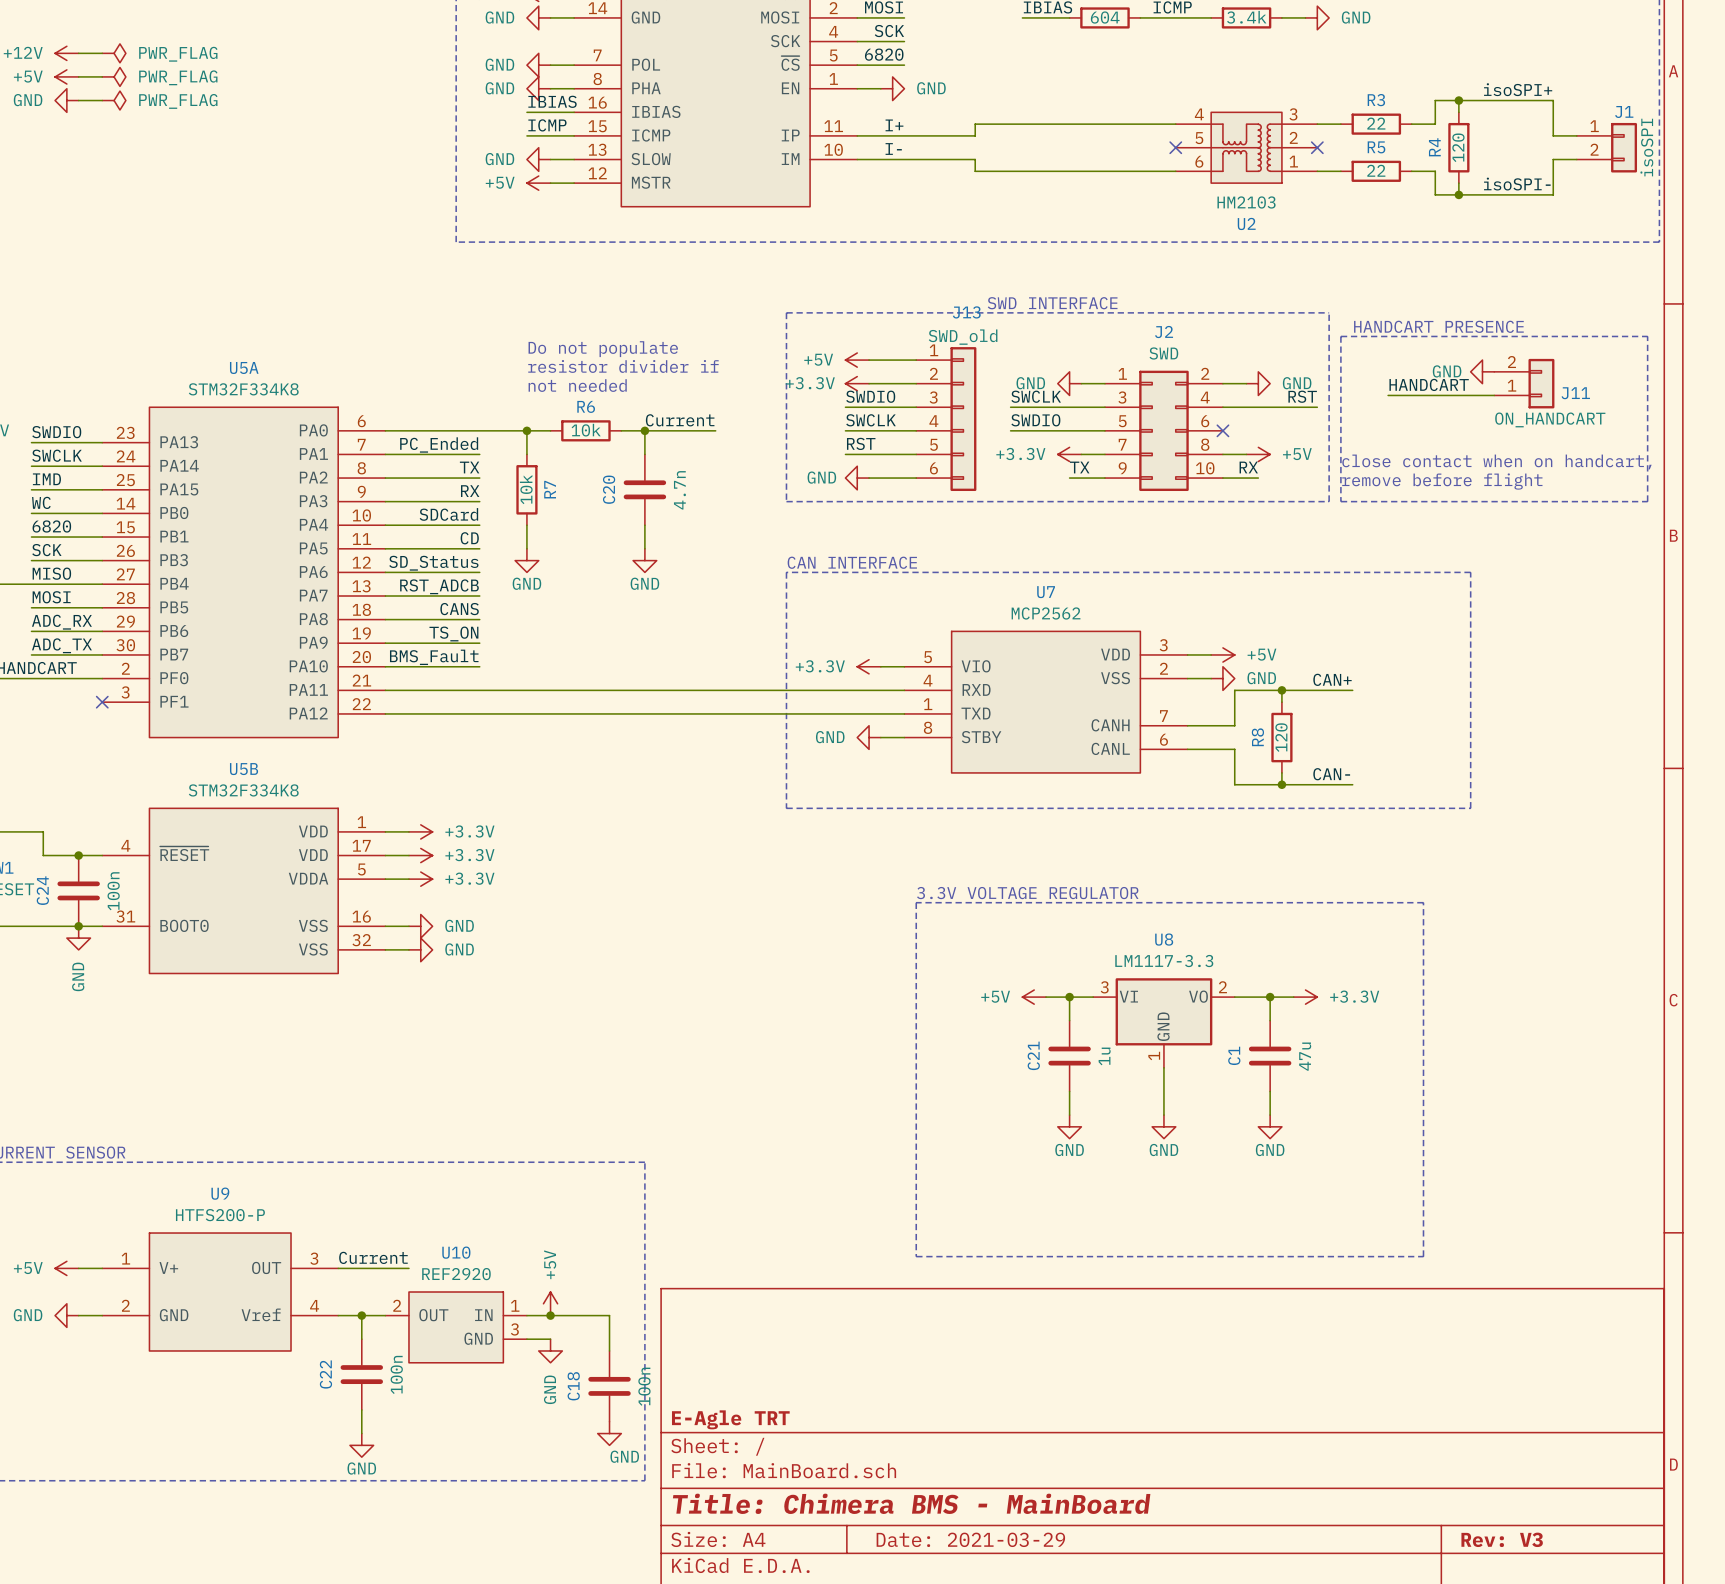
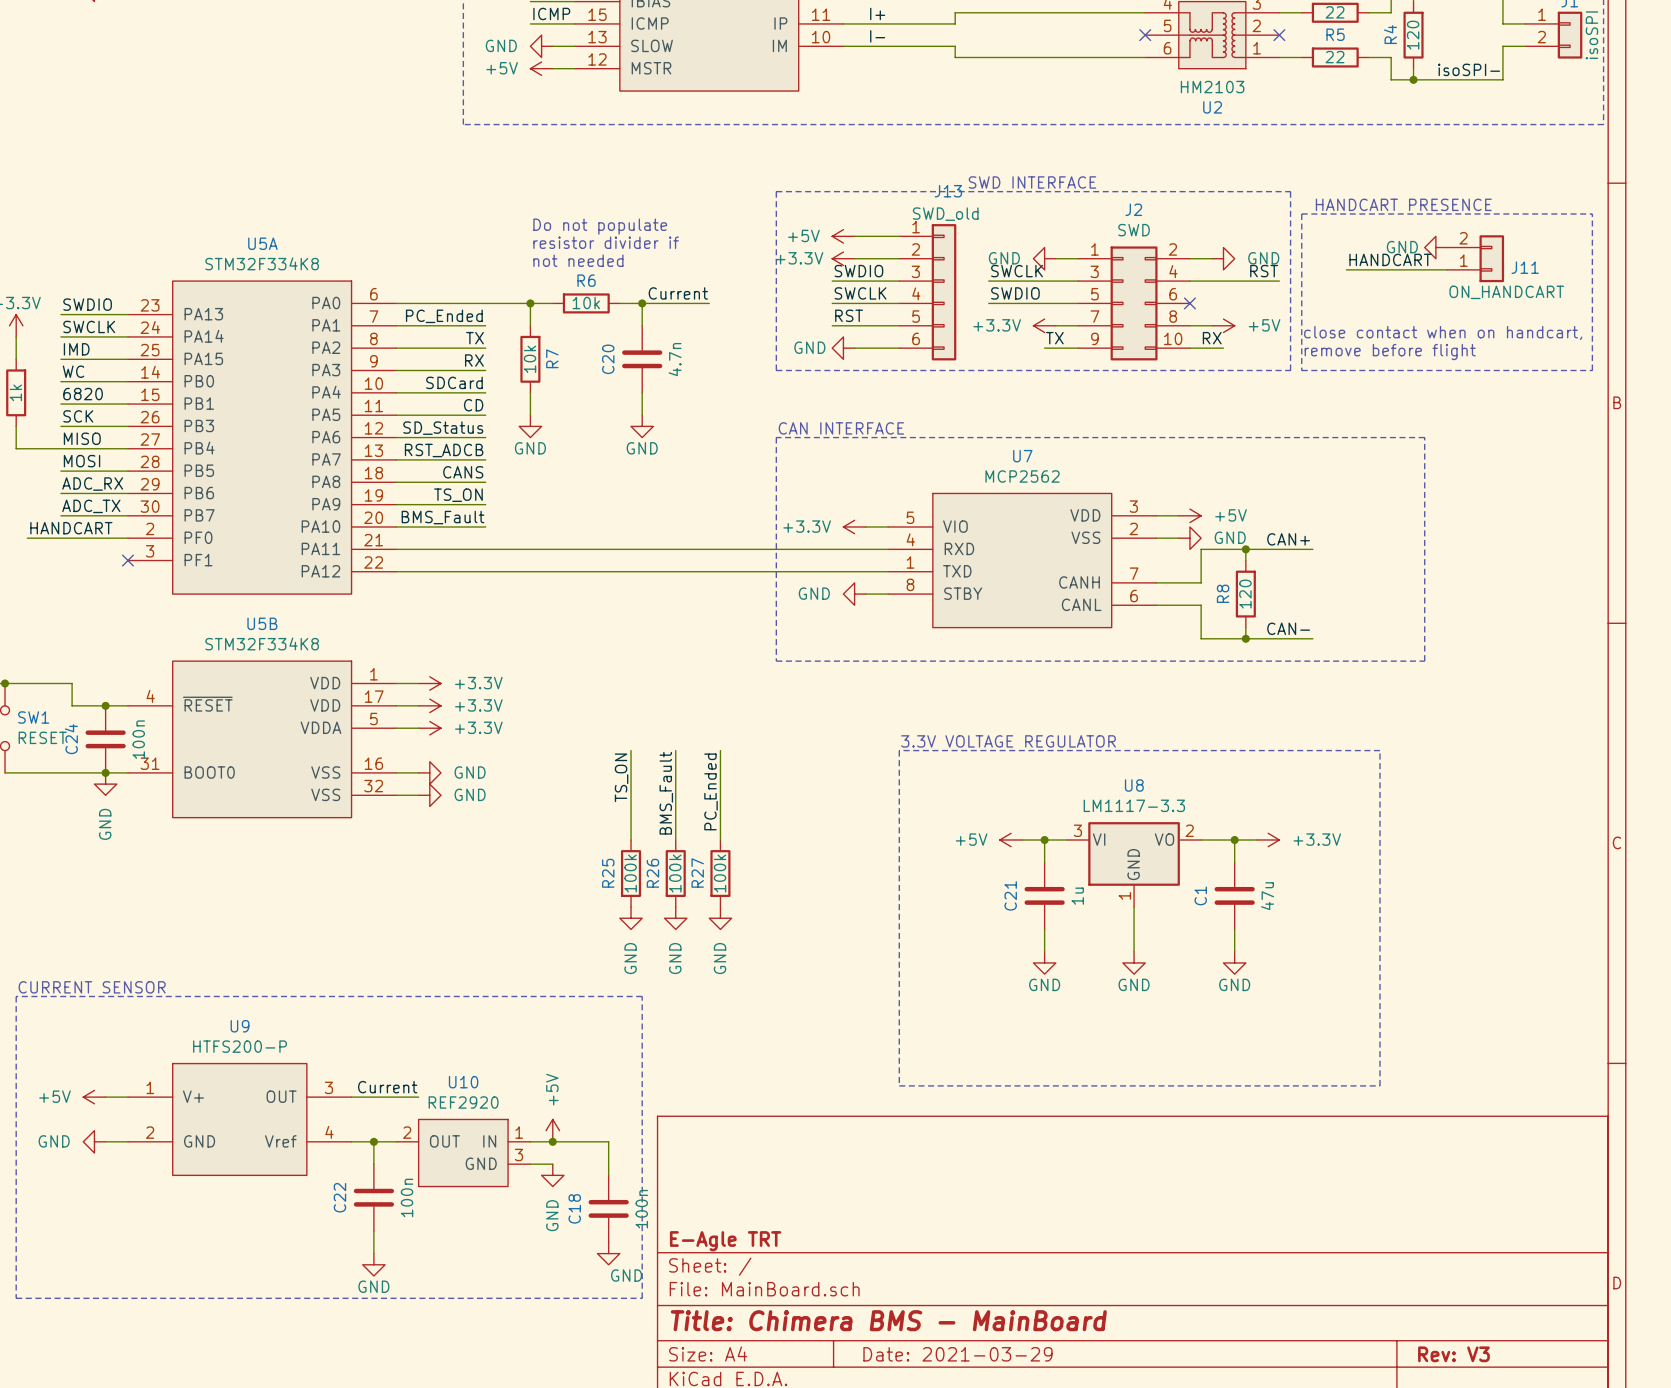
wire: none -> (631, 750) (631, 840)
wire: none -> (675, 750) (675, 840)
wire: none -> (720, 750) (720, 840)
label: none -> TS_ON (621, 777)
label: none -> PC_Ended (711, 791)
label: none -> BMS_Fault (666, 793)
R25: none -> 100k (631, 873)
R26: none -> 100k (675, 873)
R27: none -> 100k (720, 873)
power symbol: none -> GND (631, 918)
power symbol: none -> GND (675, 918)
power symbol: none -> GND (720, 918)

